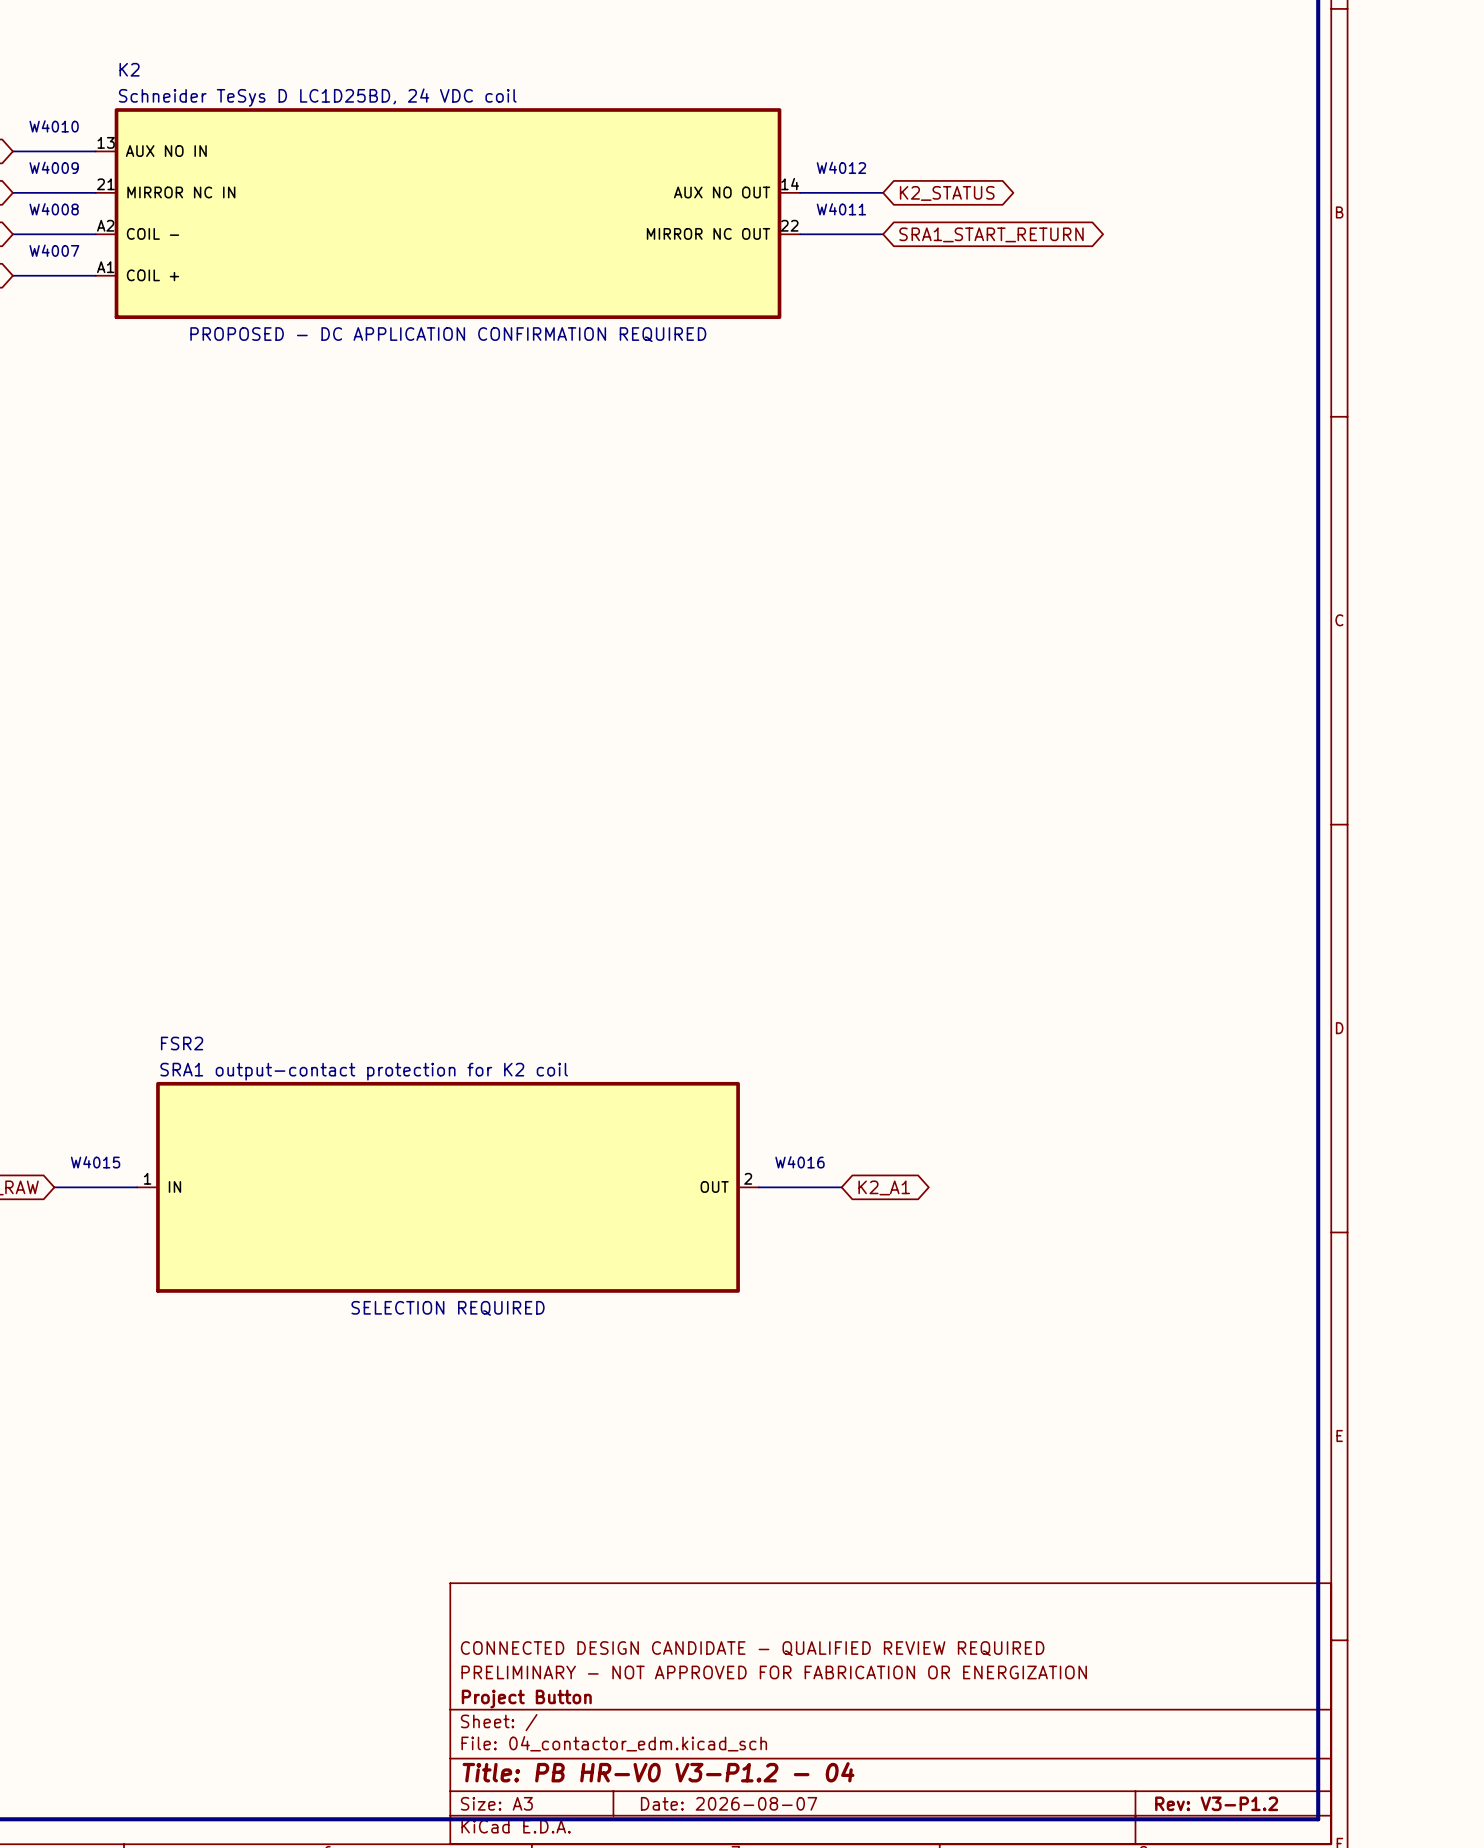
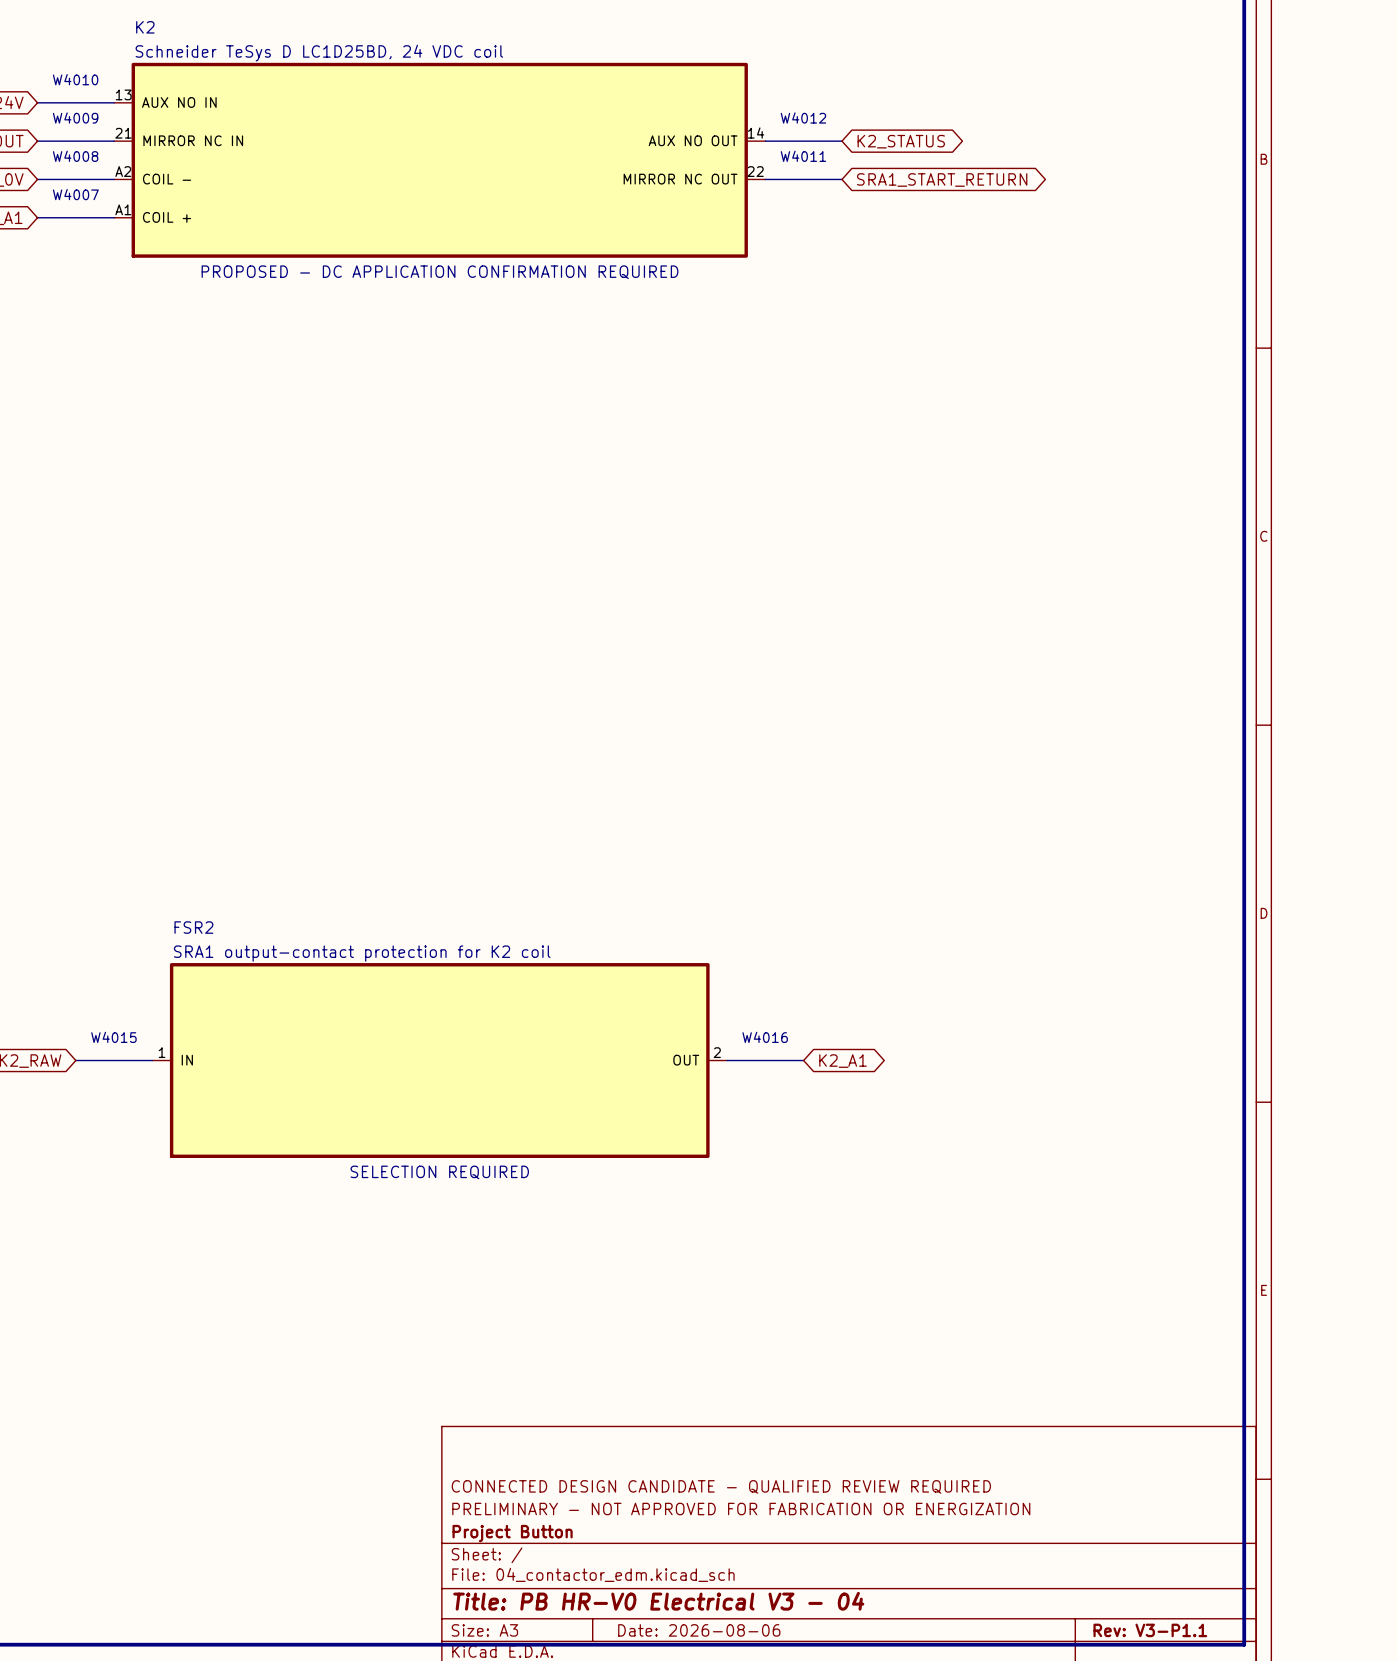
title block: Title: PB HR-V0 V3-P1.2 - 04 (658, 1772) -> Title: PB HR-V0 Electrical V3 - 04 (658, 1601)
title block: Date: 2026-08-07 (729, 1803) -> Date: 2026-08-06 (699, 1630)
title block: Rev: V3-P1.2 (1216, 1803) -> Rev: V3-P1.1 (1150, 1630)

